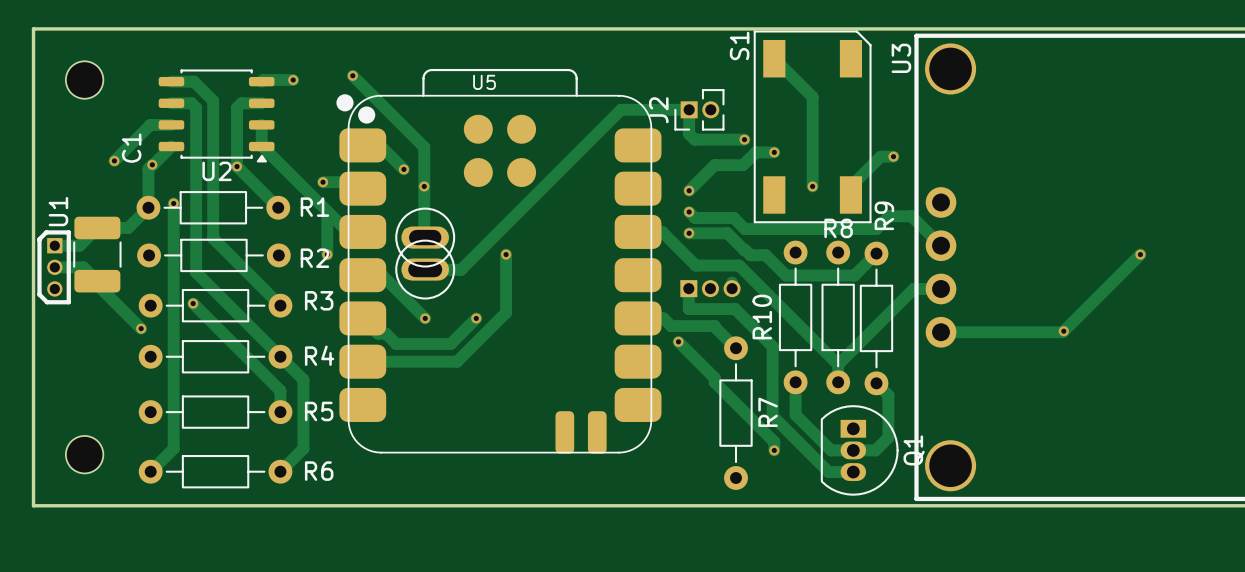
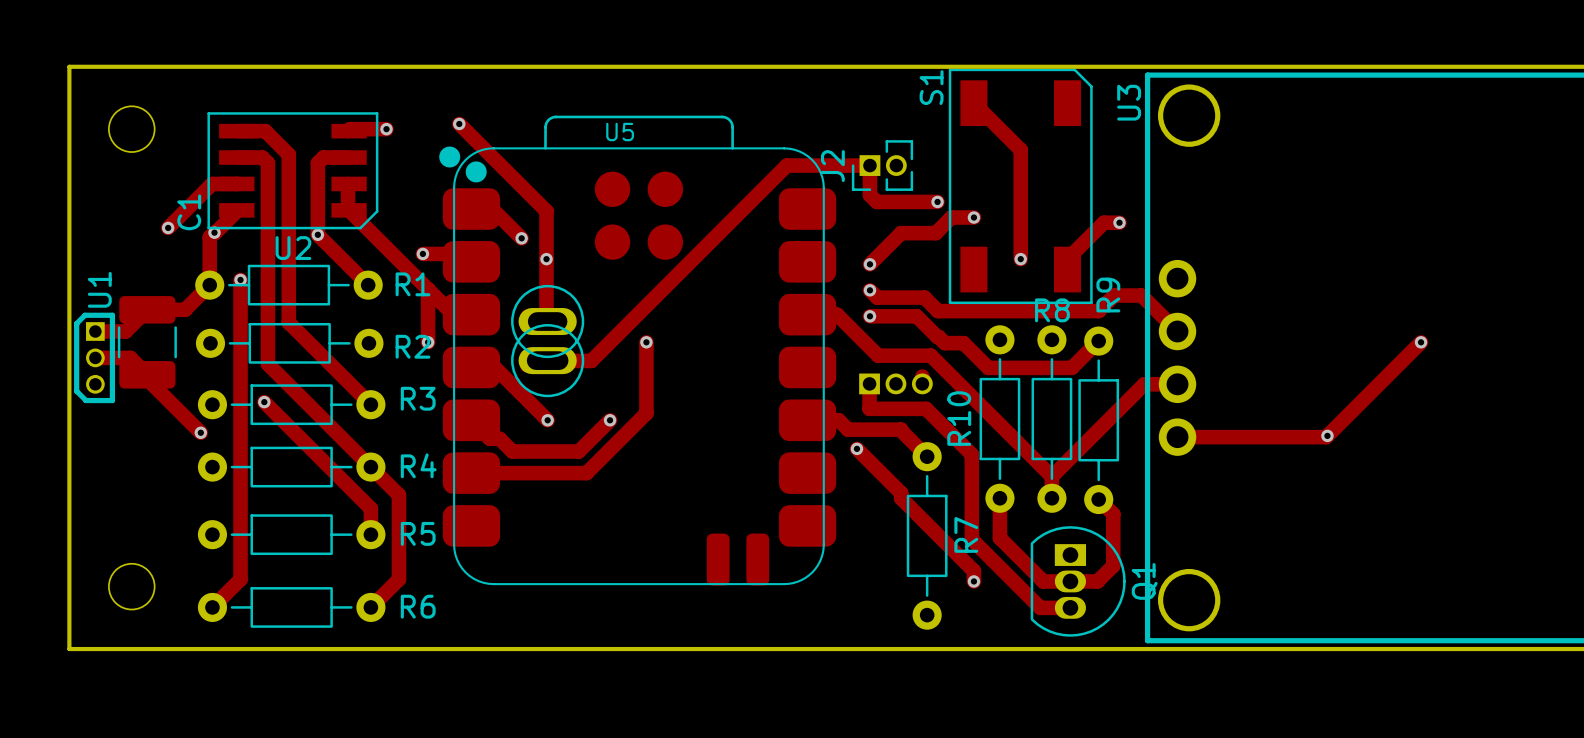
U2 footprint: [158, 69, 275, 163] -> [207, 112, 379, 230]

